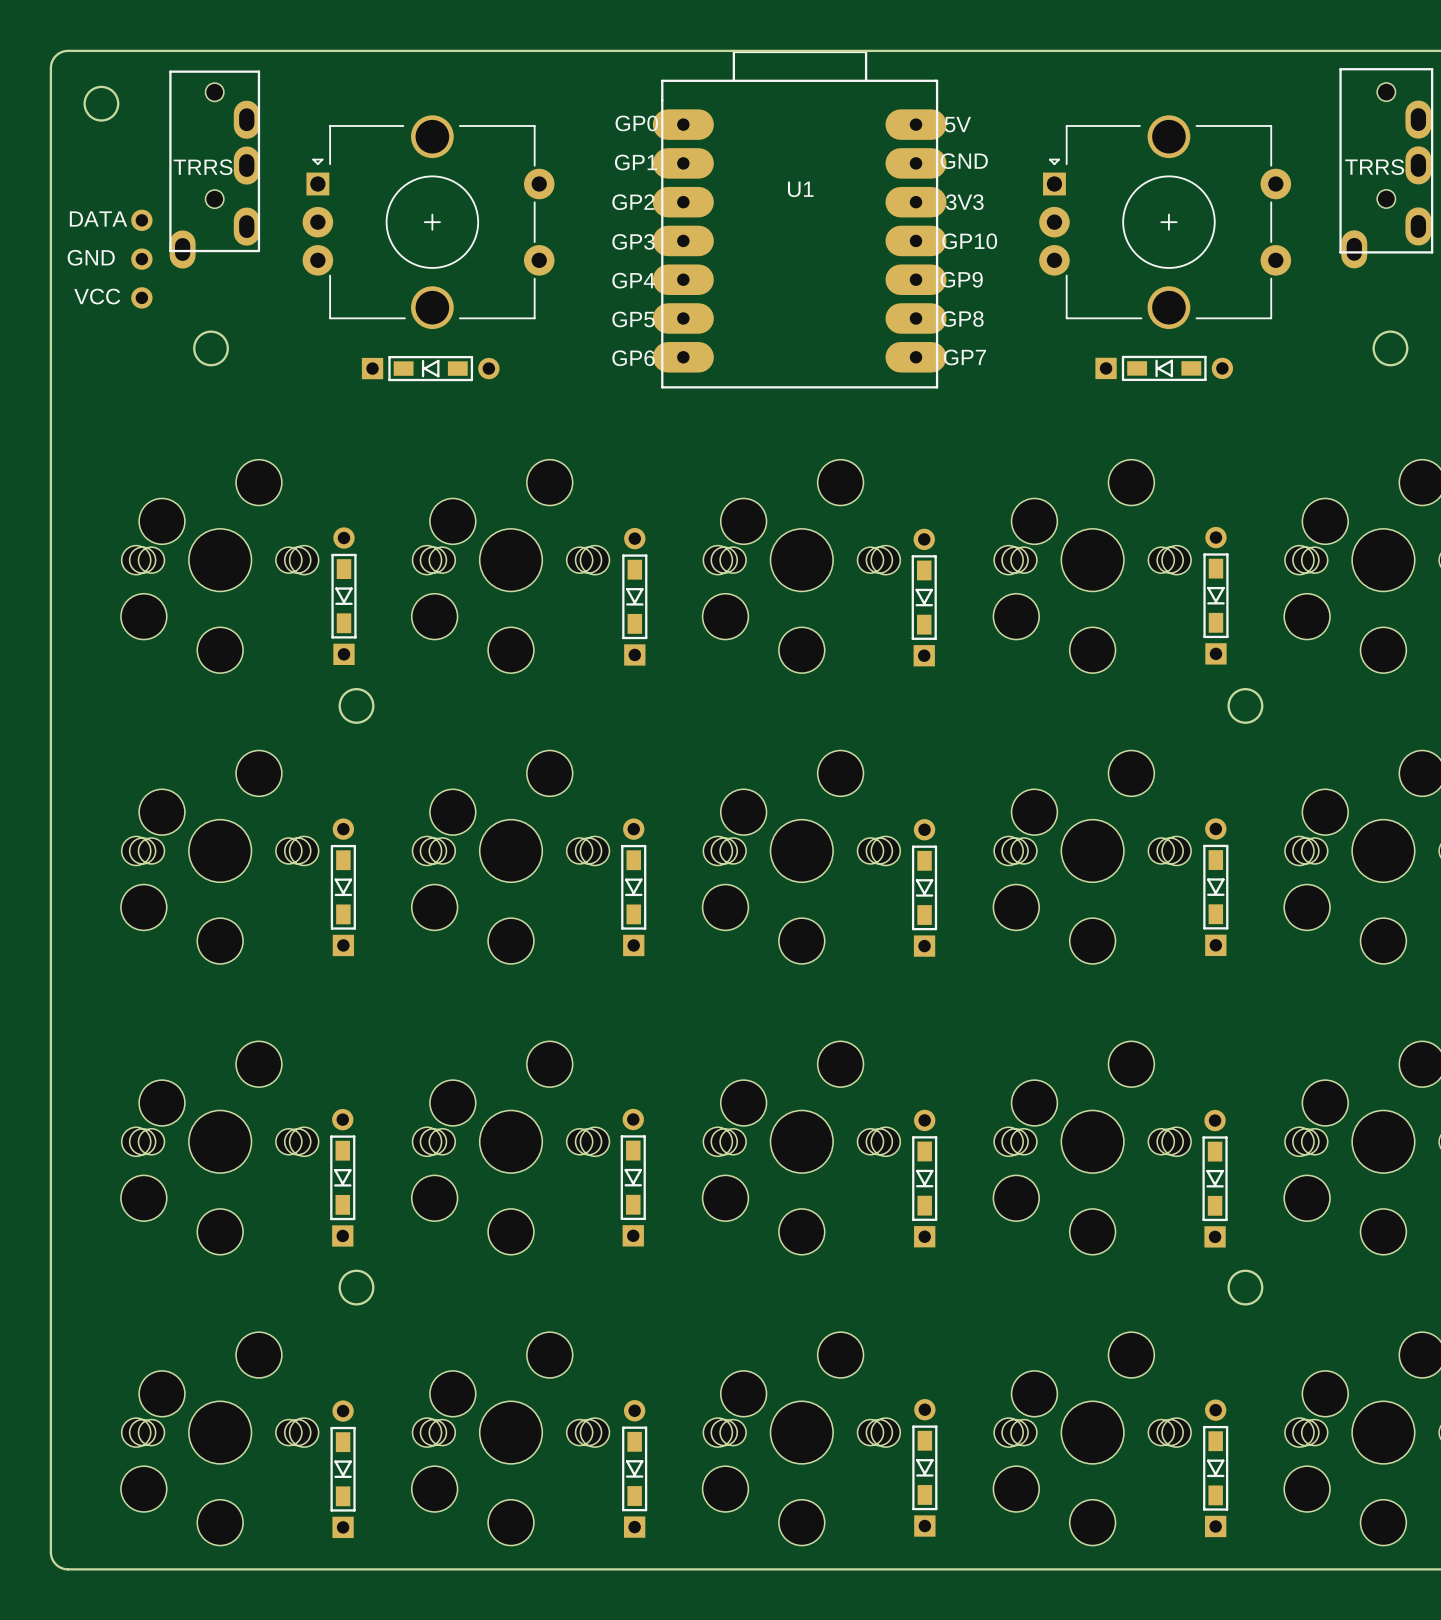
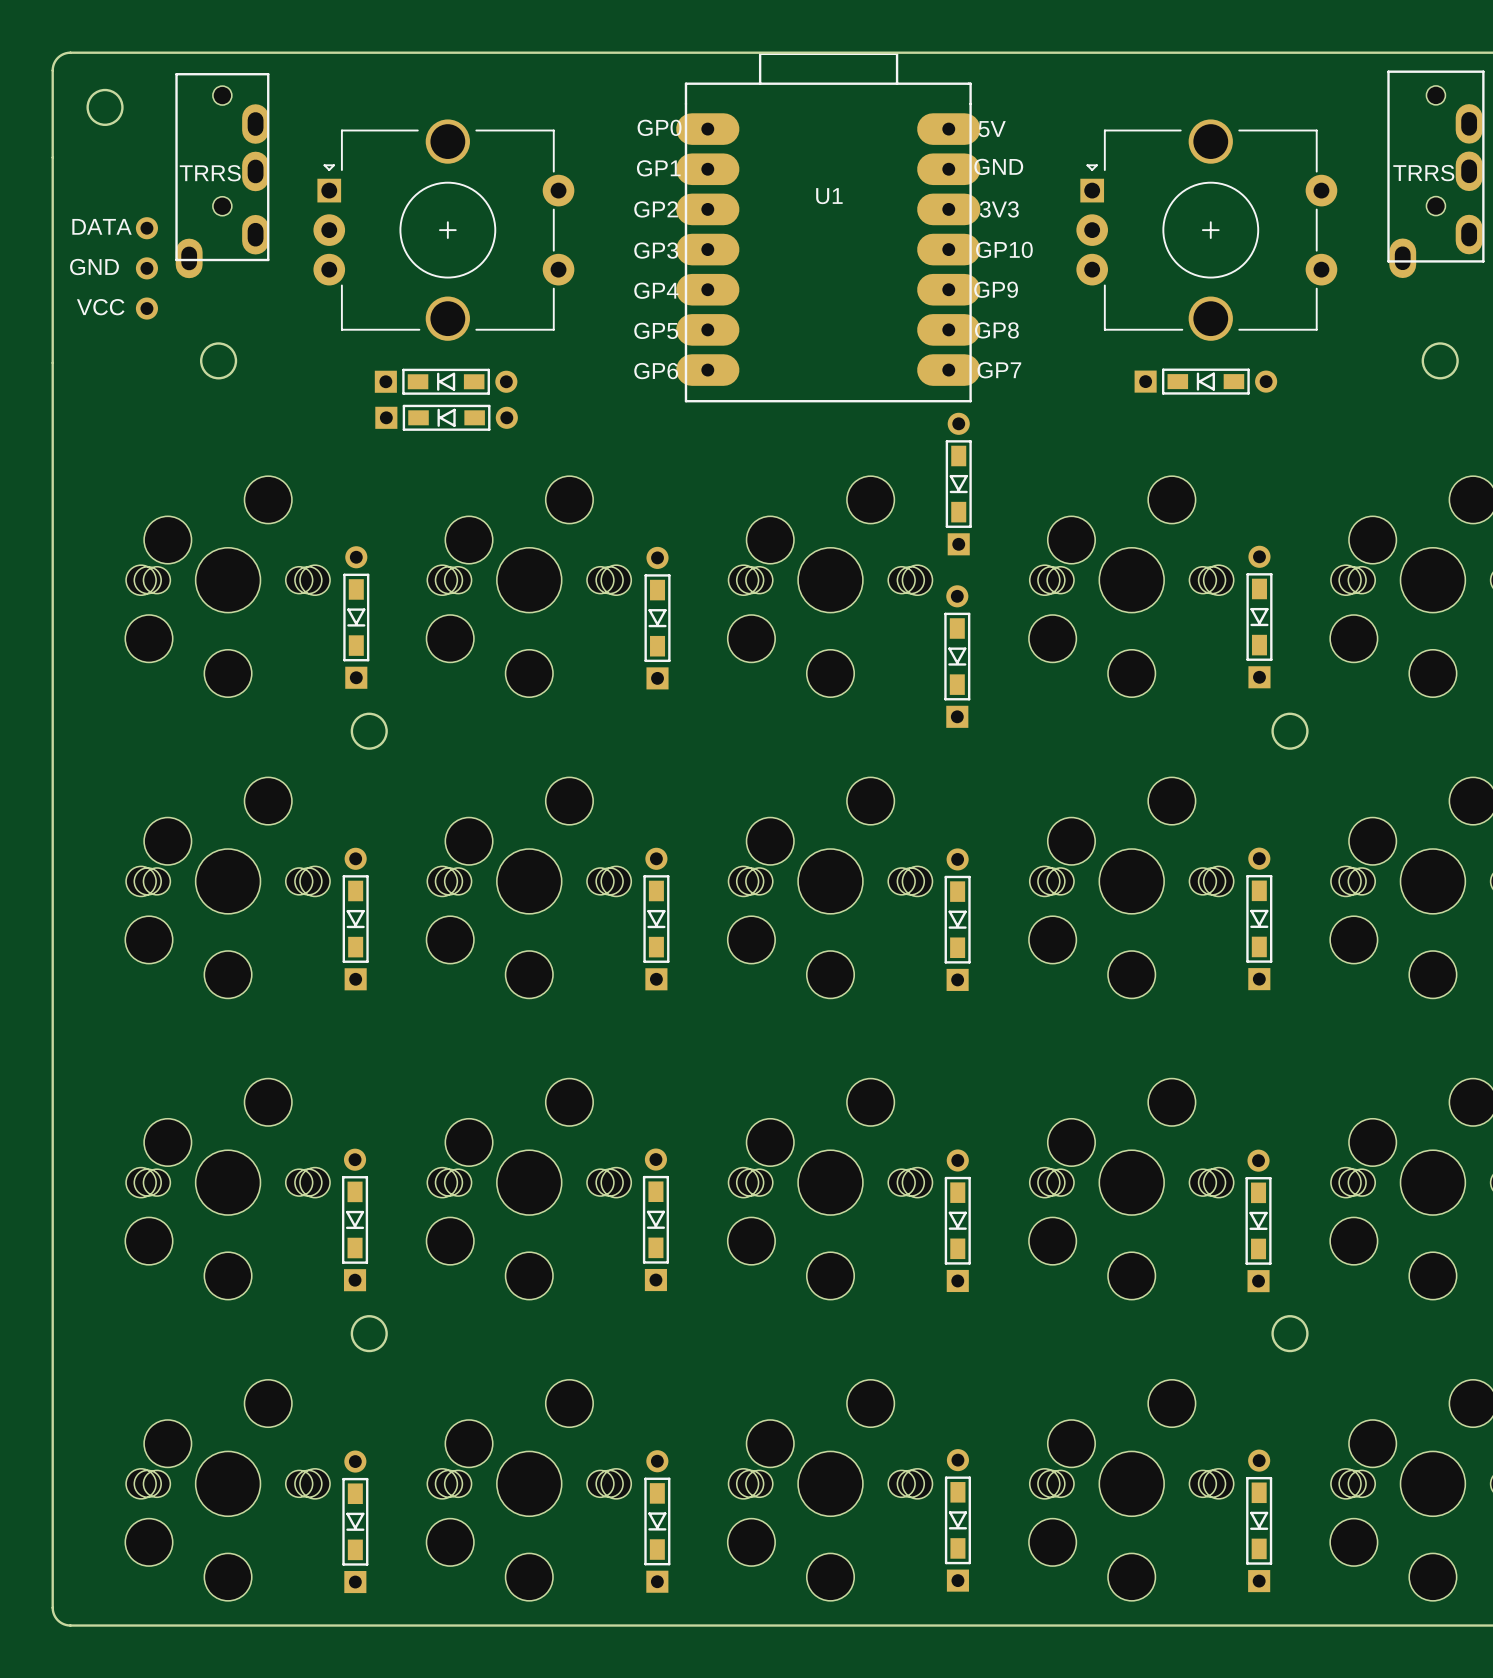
part: none -> (446, 417)
part: none -> (958, 484)
part position: (924, 597) -> (957, 656)

